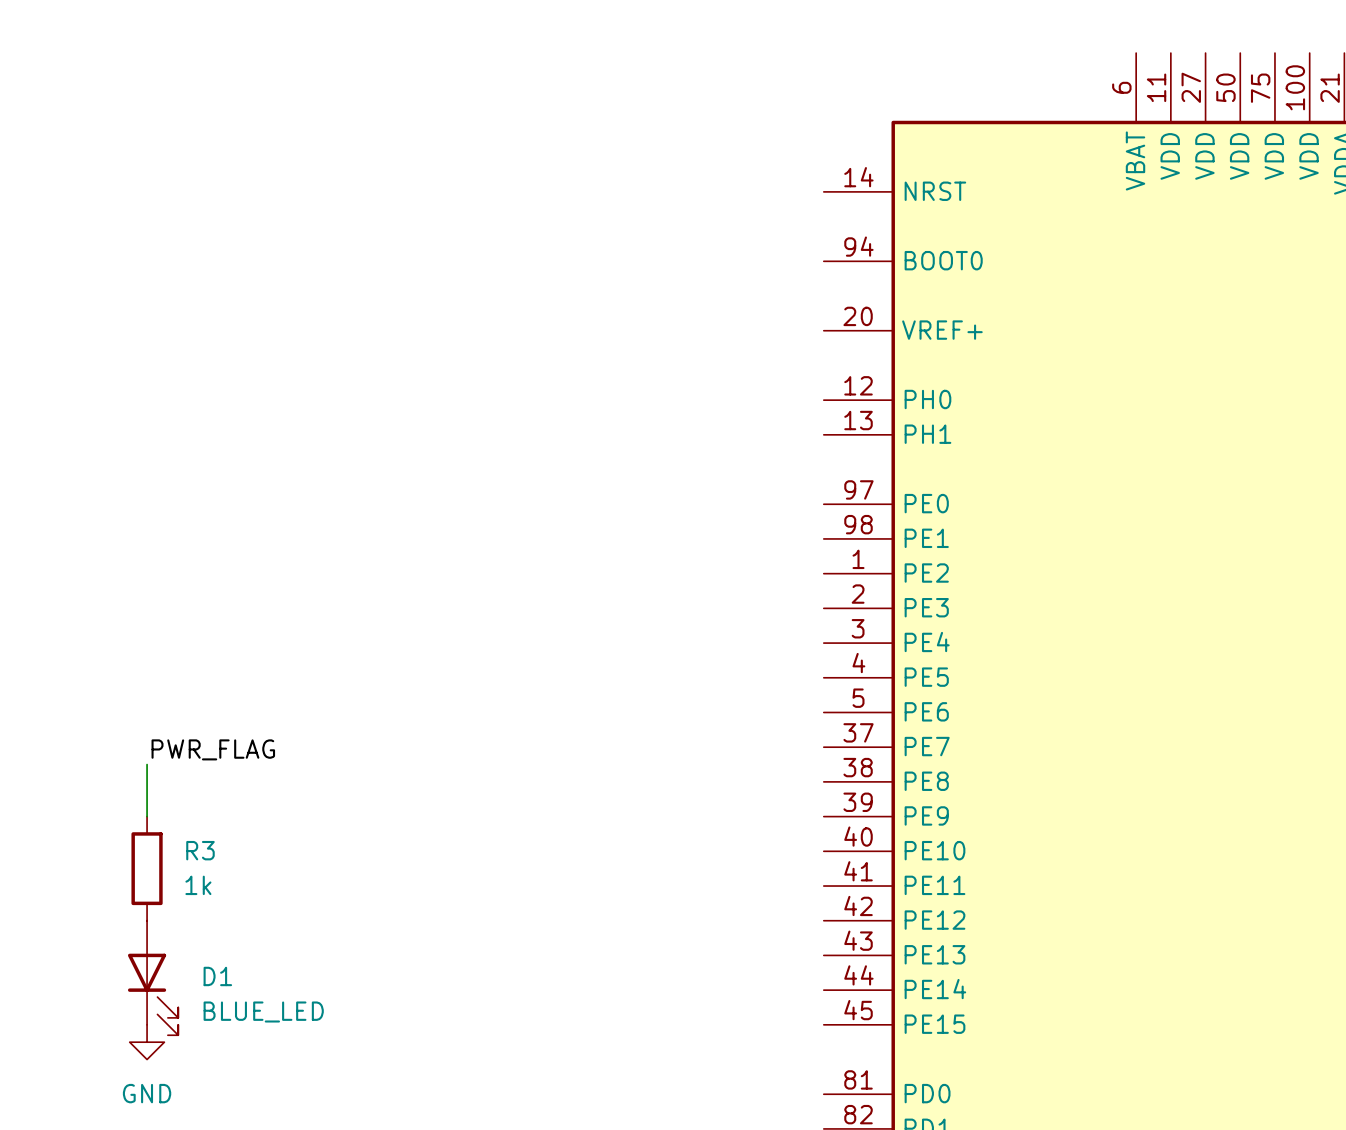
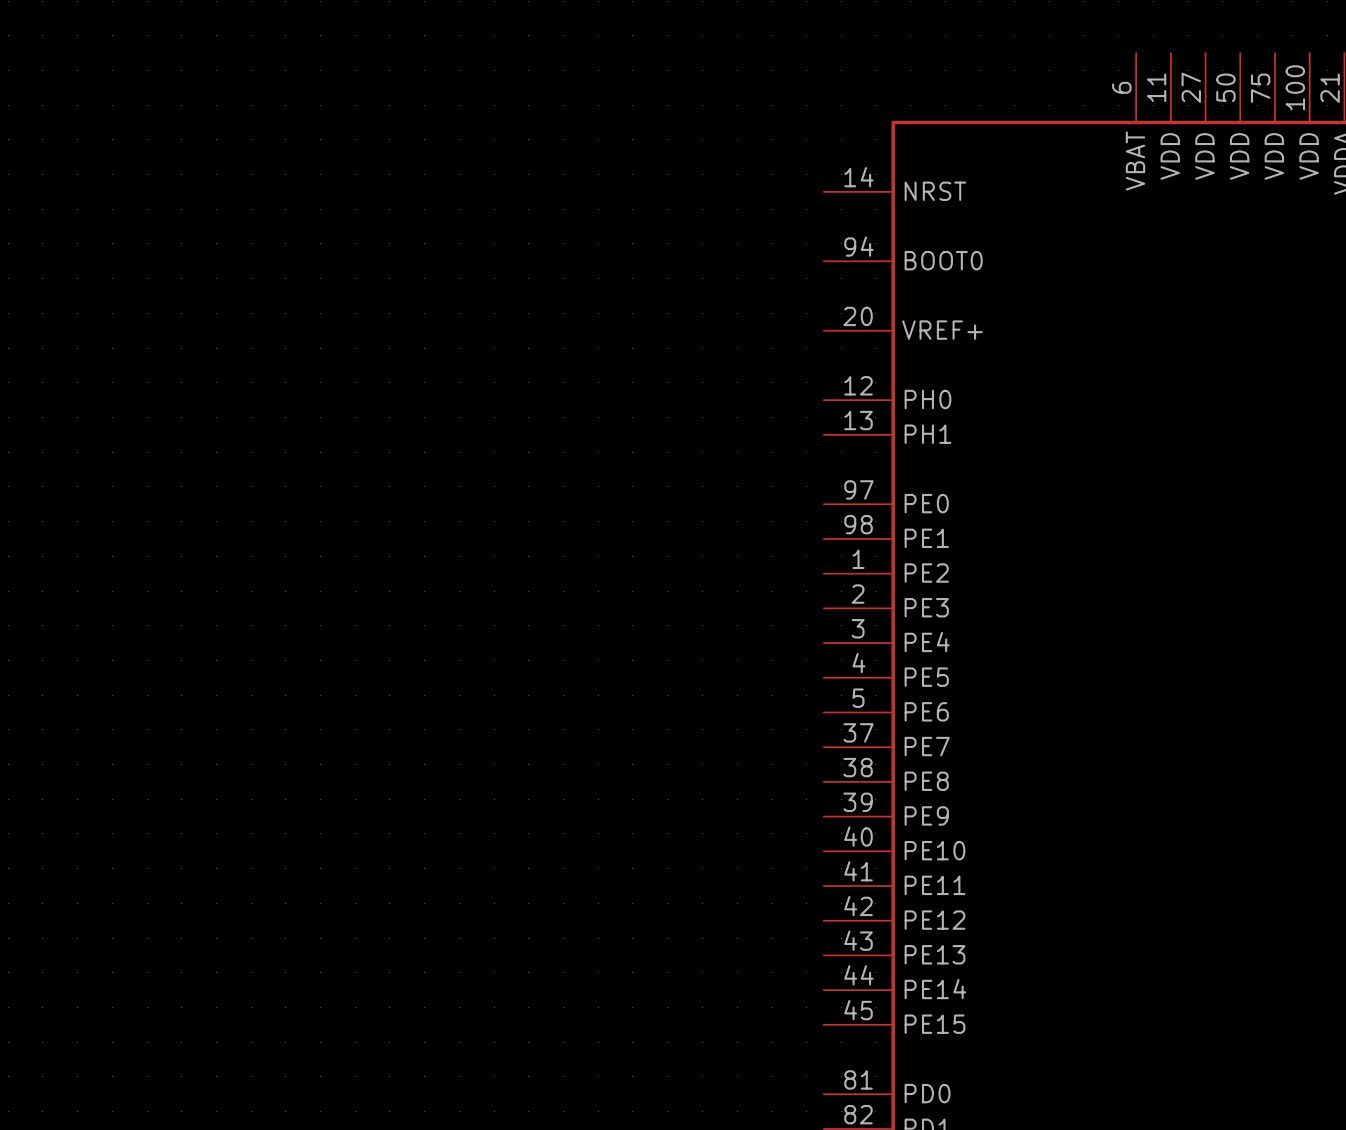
label: PWR_FLAG (213, 749) -> none
wire: (147, 764) (147, 816) -> none
R3: 1k (147, 868) -> none
D1: BLUE_LED (153, 977) -> none
power symbol: GND (147, 1042) -> none

